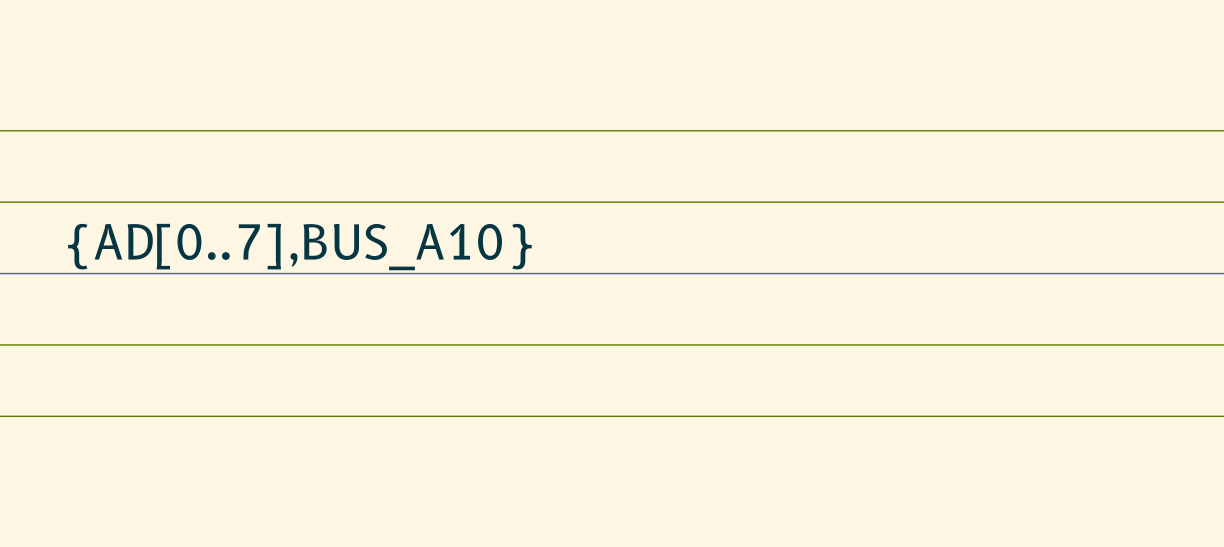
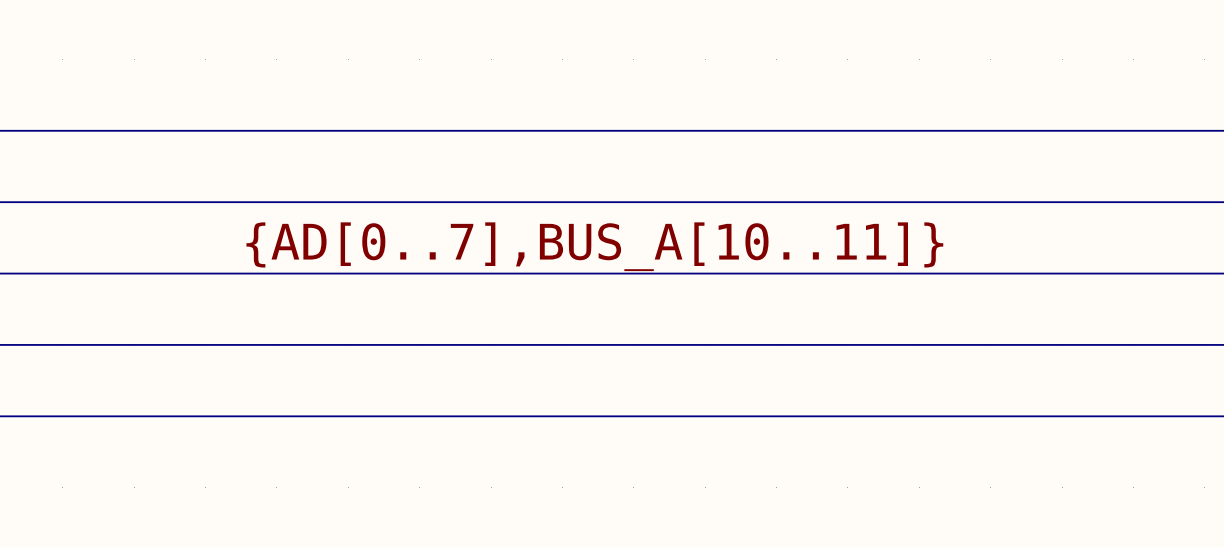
label: {AD[0..7],BUS_A10} (299, 247) -> {AD[0..7],BUS_A[10..11]} (594, 246)

